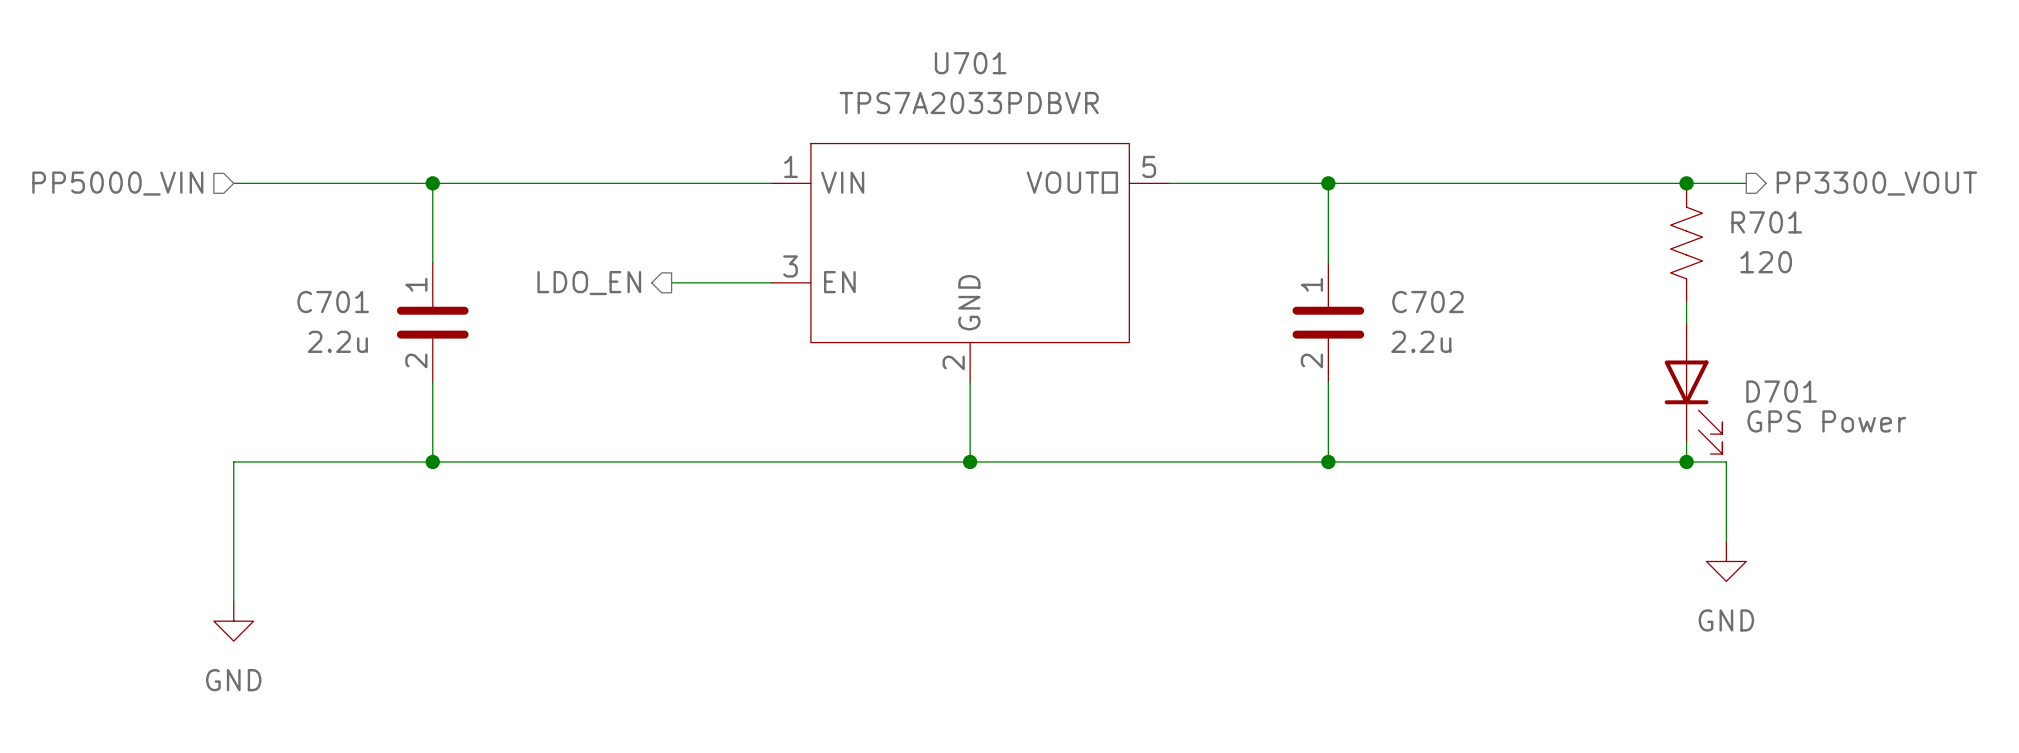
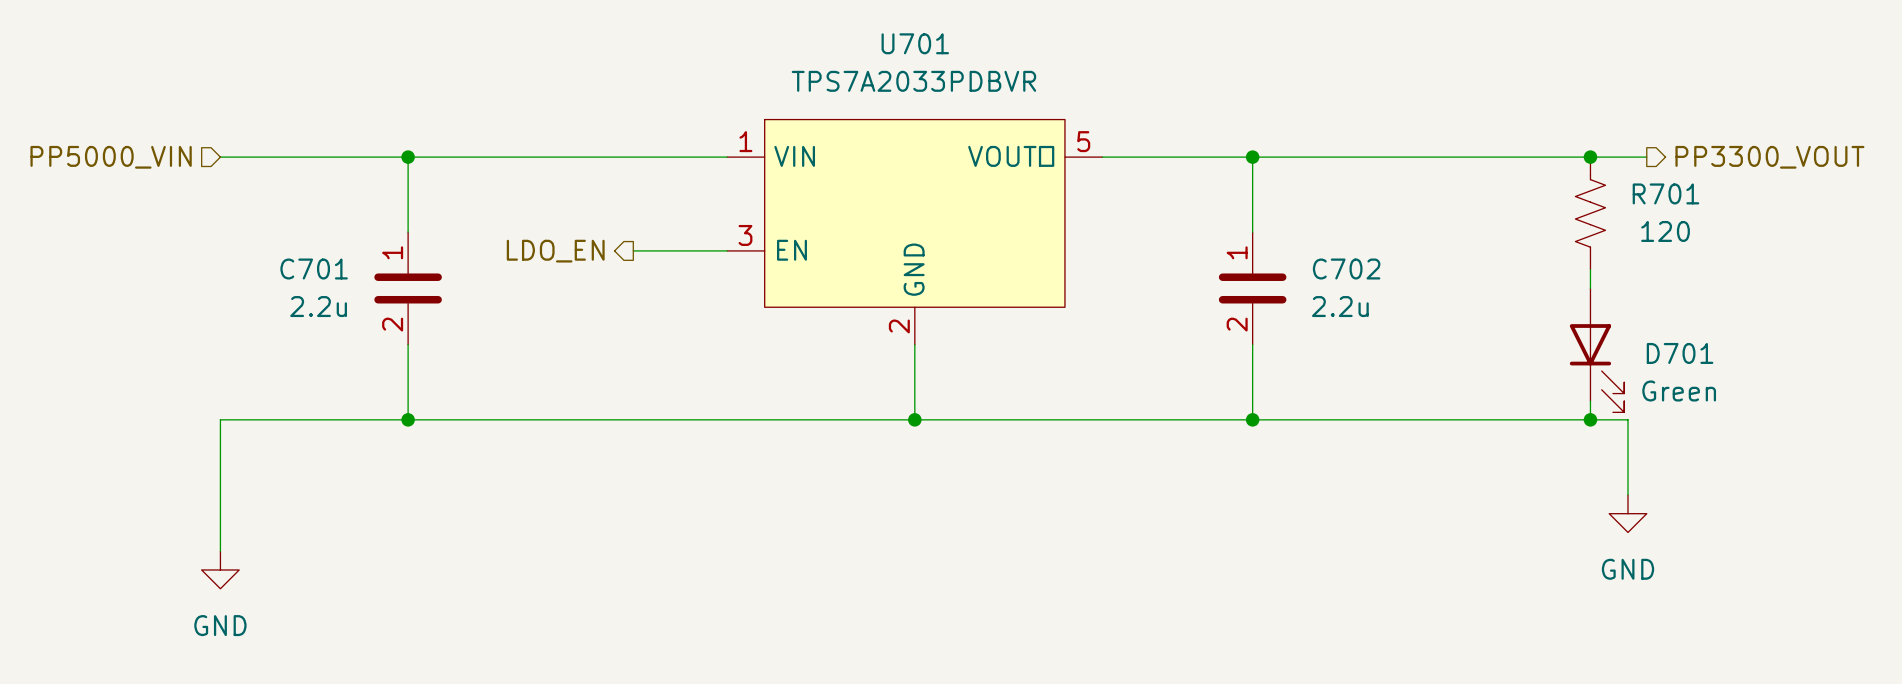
D701 value: GPS Power (1826, 421) -> Green (1679, 390)

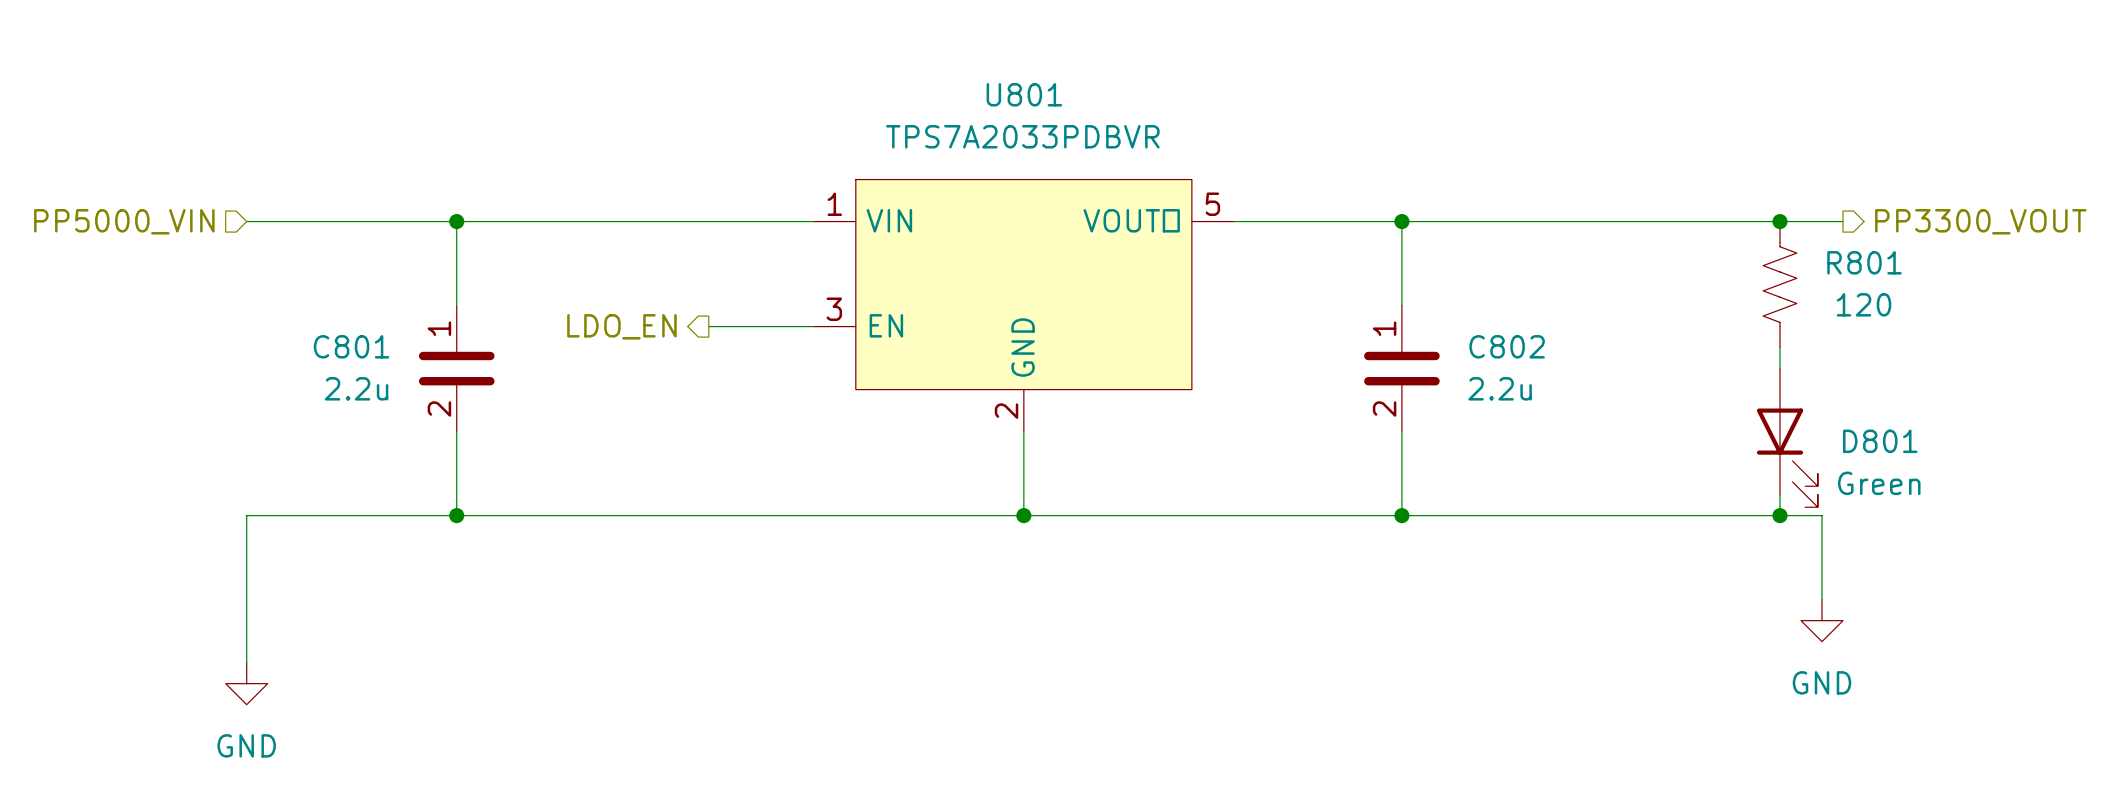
U701 name: U701 (915, 43) -> U801 (1024, 94)
R701 name: R701 (1665, 193) -> R801 (1864, 262)
C701 name: C701 (314, 269) -> C801 (351, 346)
C702 name: C702 (1346, 269) -> C802 (1507, 346)
D701 name: D701 (1680, 353) -> D801 (1880, 441)

